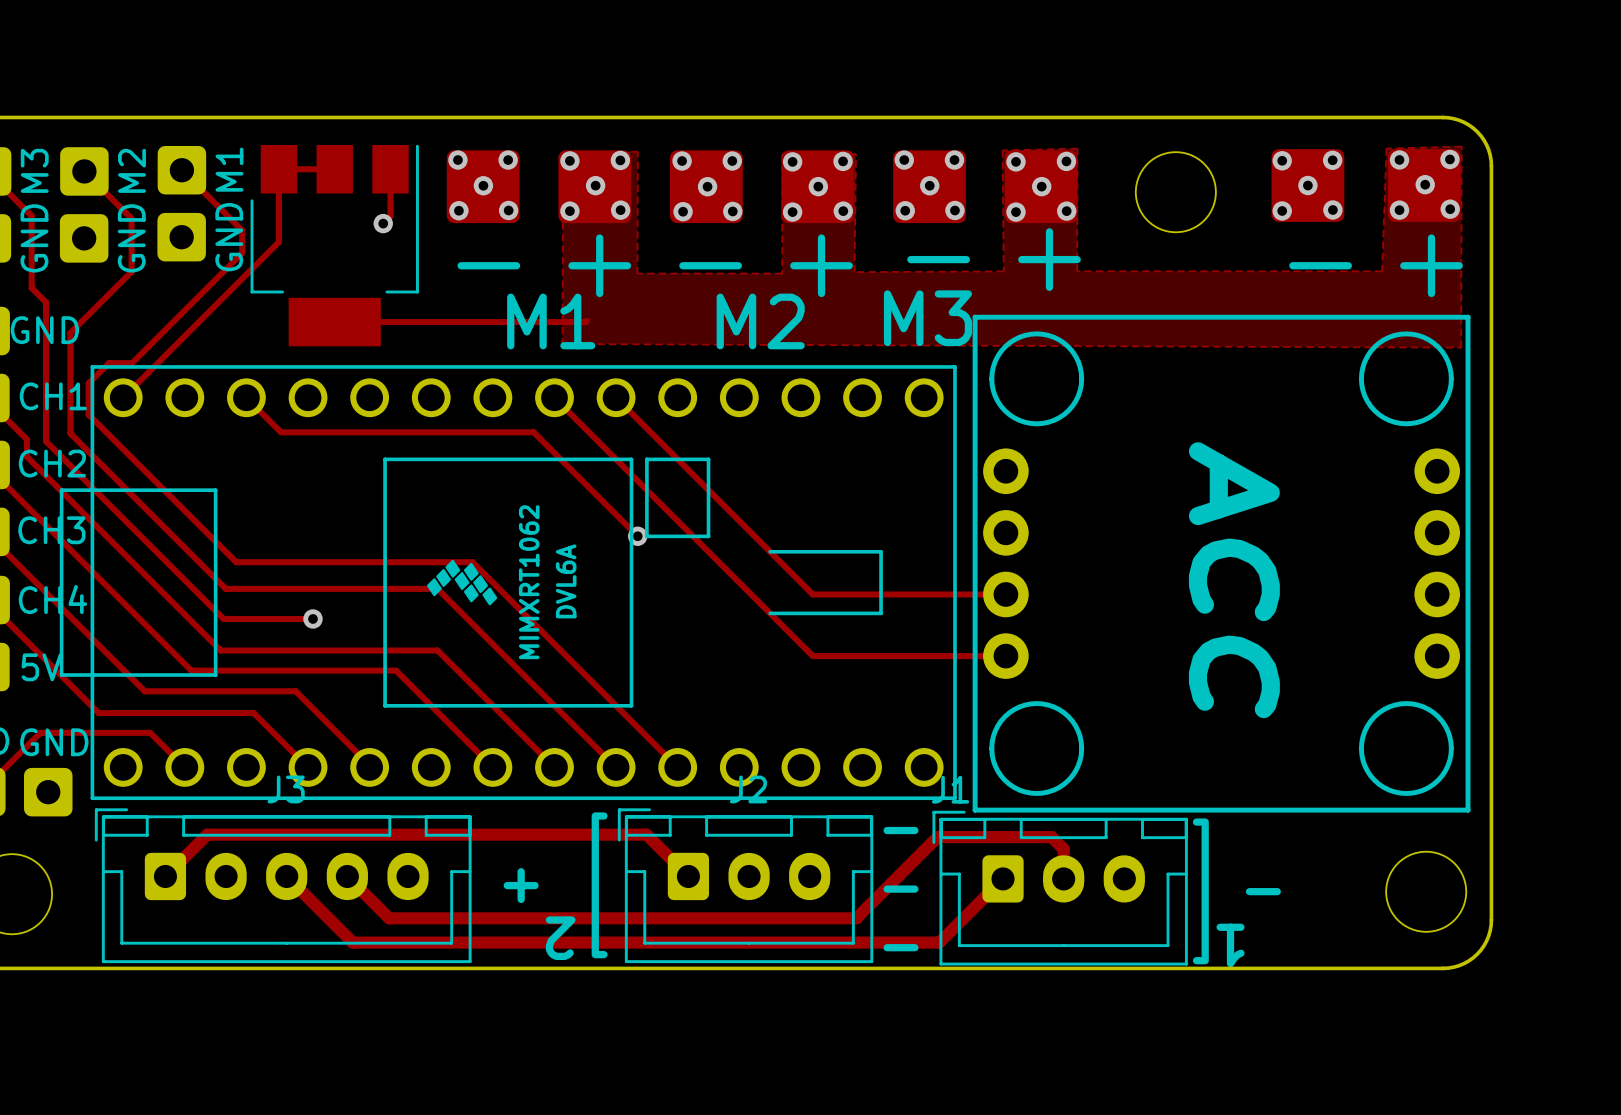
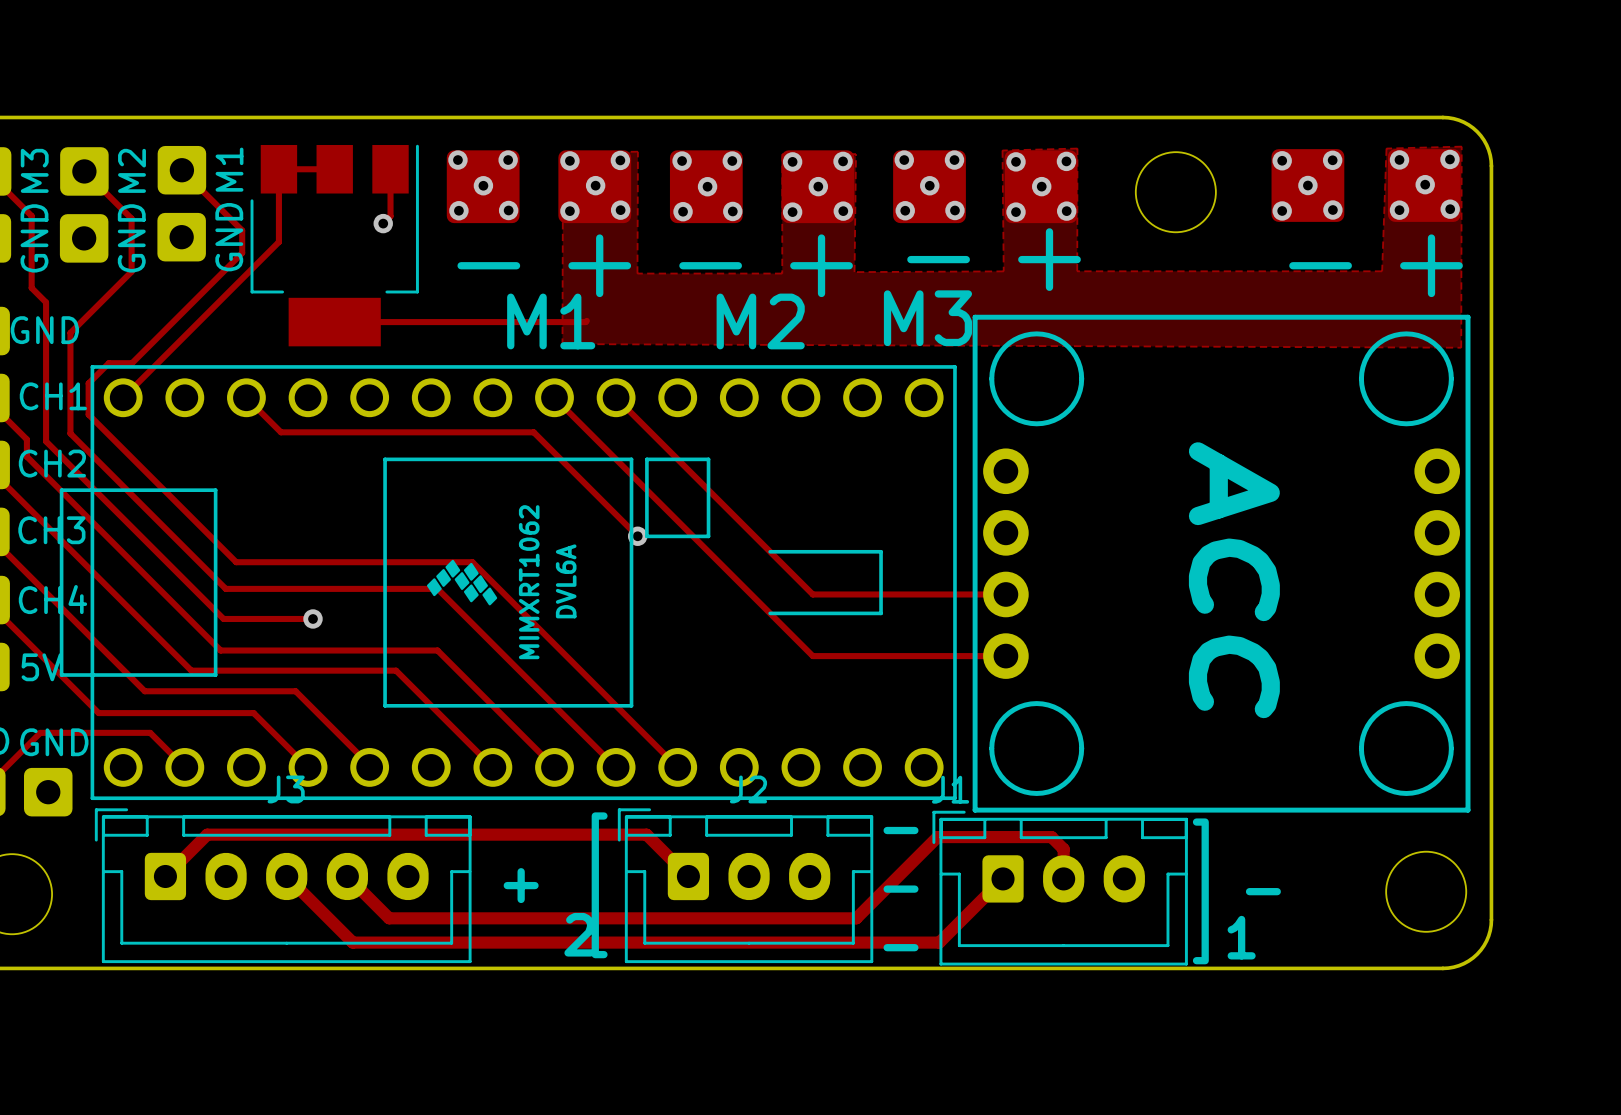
text rotation: 0° (560, 938) -> 180° (579, 934)
text rotation: 0° (1230, 945) -> 180° (1241, 937)

